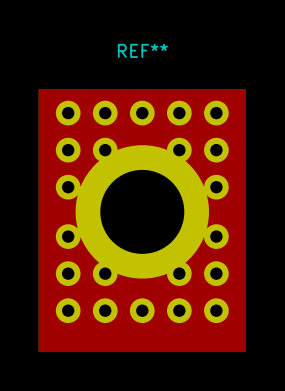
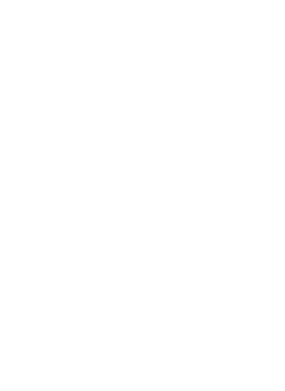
REF**: (142, 220) -> none

